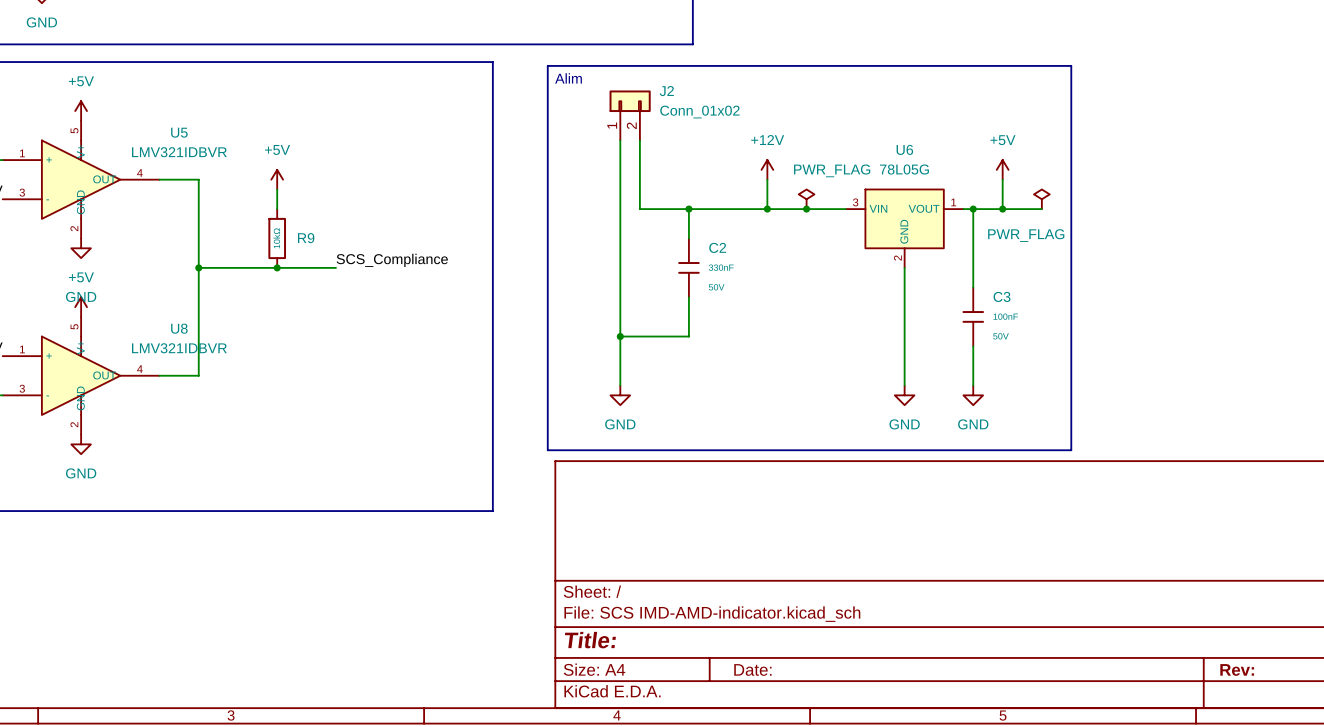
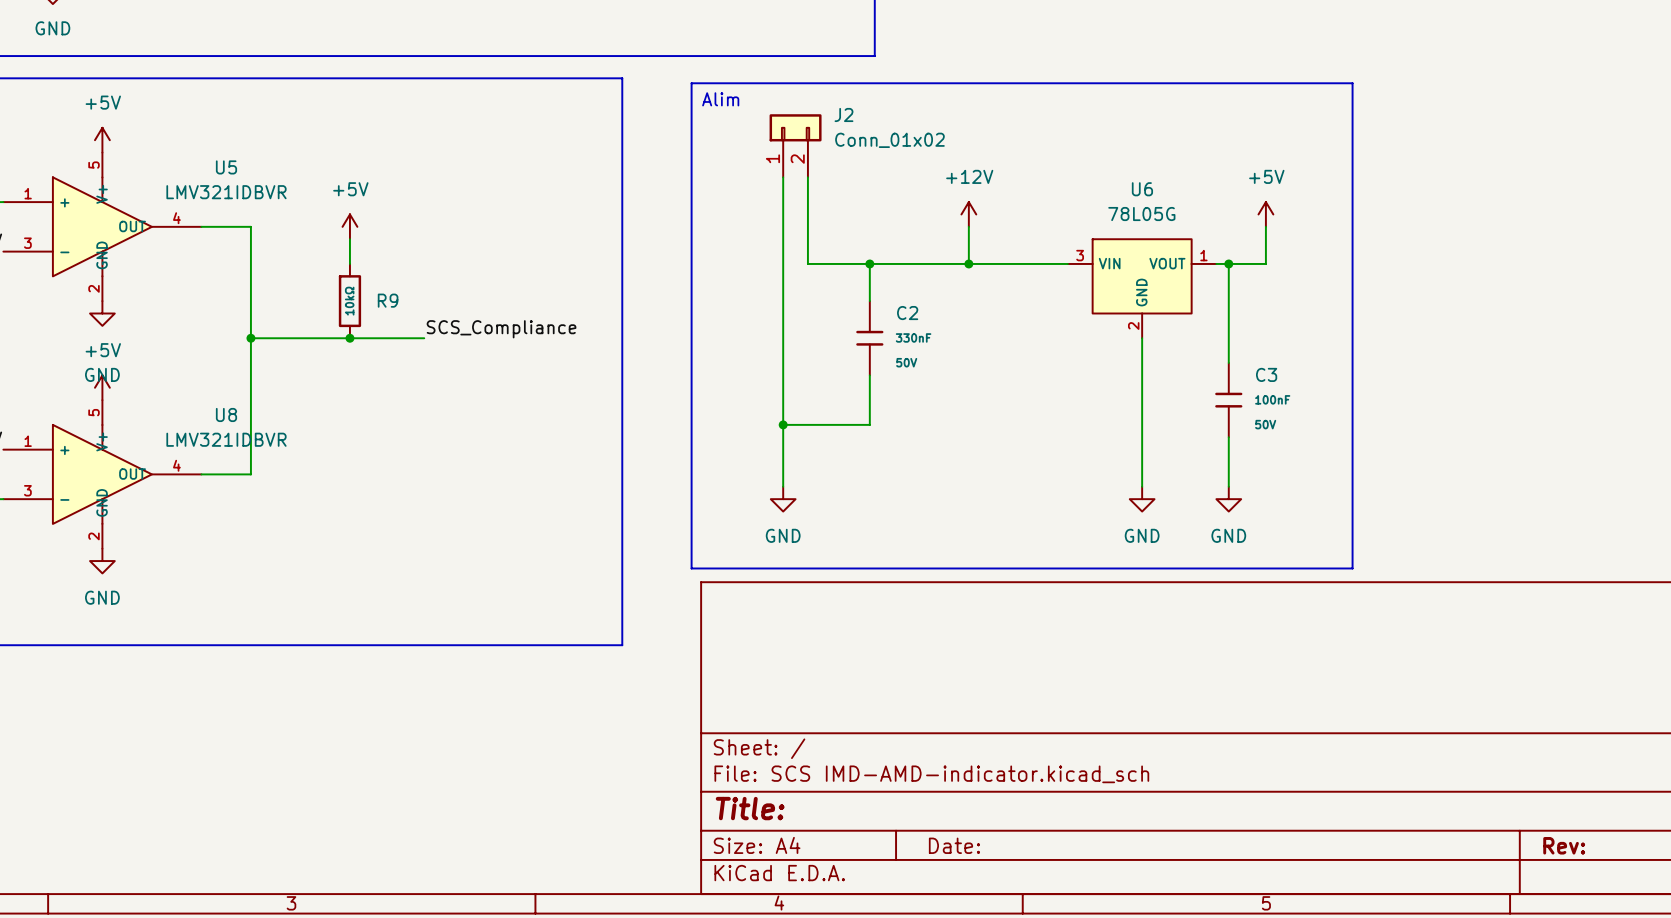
power symbol: PWR_FLAG (806, 199) -> none
power symbol: PWR_FLAG (1041, 199) -> none
junction: (806, 209) -> none
wire: (1002, 209) (1041, 209) -> none
junction: (1002, 209) -> none

